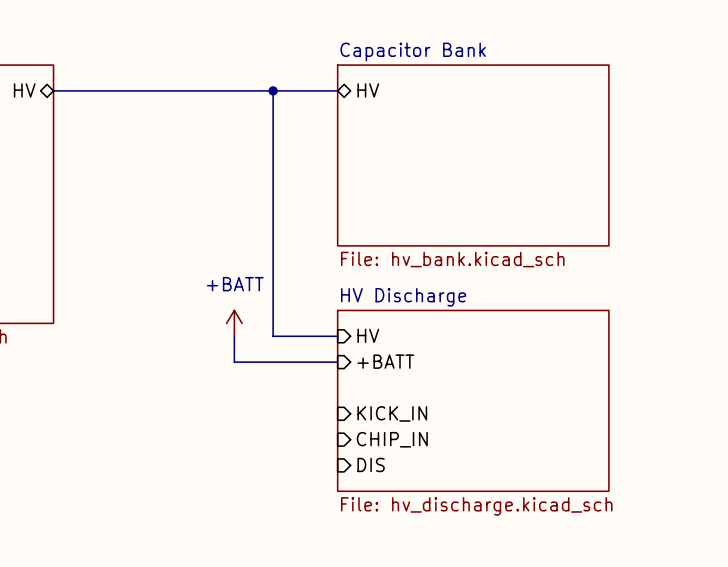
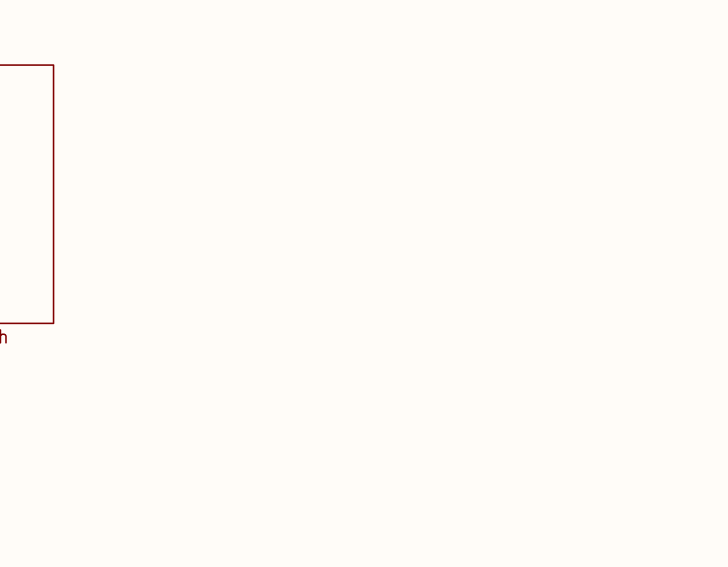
sheet pin: HV (24, 90) -> none
wire: (53, 90) (337, 90) -> none
wire: (273, 90) (273, 336) (337, 336) -> none
junction: (273, 90) -> none
sheet pin: HV (368, 90) -> none
sheet Capacitor Bank: File: hv_bank.kicad_sch (473, 155) -> none
power symbol: +BATT (234, 323) -> none
sheet pin: HV (368, 335) -> none
wire: (234, 336) (234, 362) (337, 362) -> none
sheet pin: +BATT (385, 361) -> none
sheet HV Discharge: File: hv_discharge.kicad_sch (473, 400) -> none
sheet pin: KICK_IN (392, 413) -> none
sheet pin: CHIP_IN (392, 439) -> none
sheet pin: DIS (371, 464) -> none

